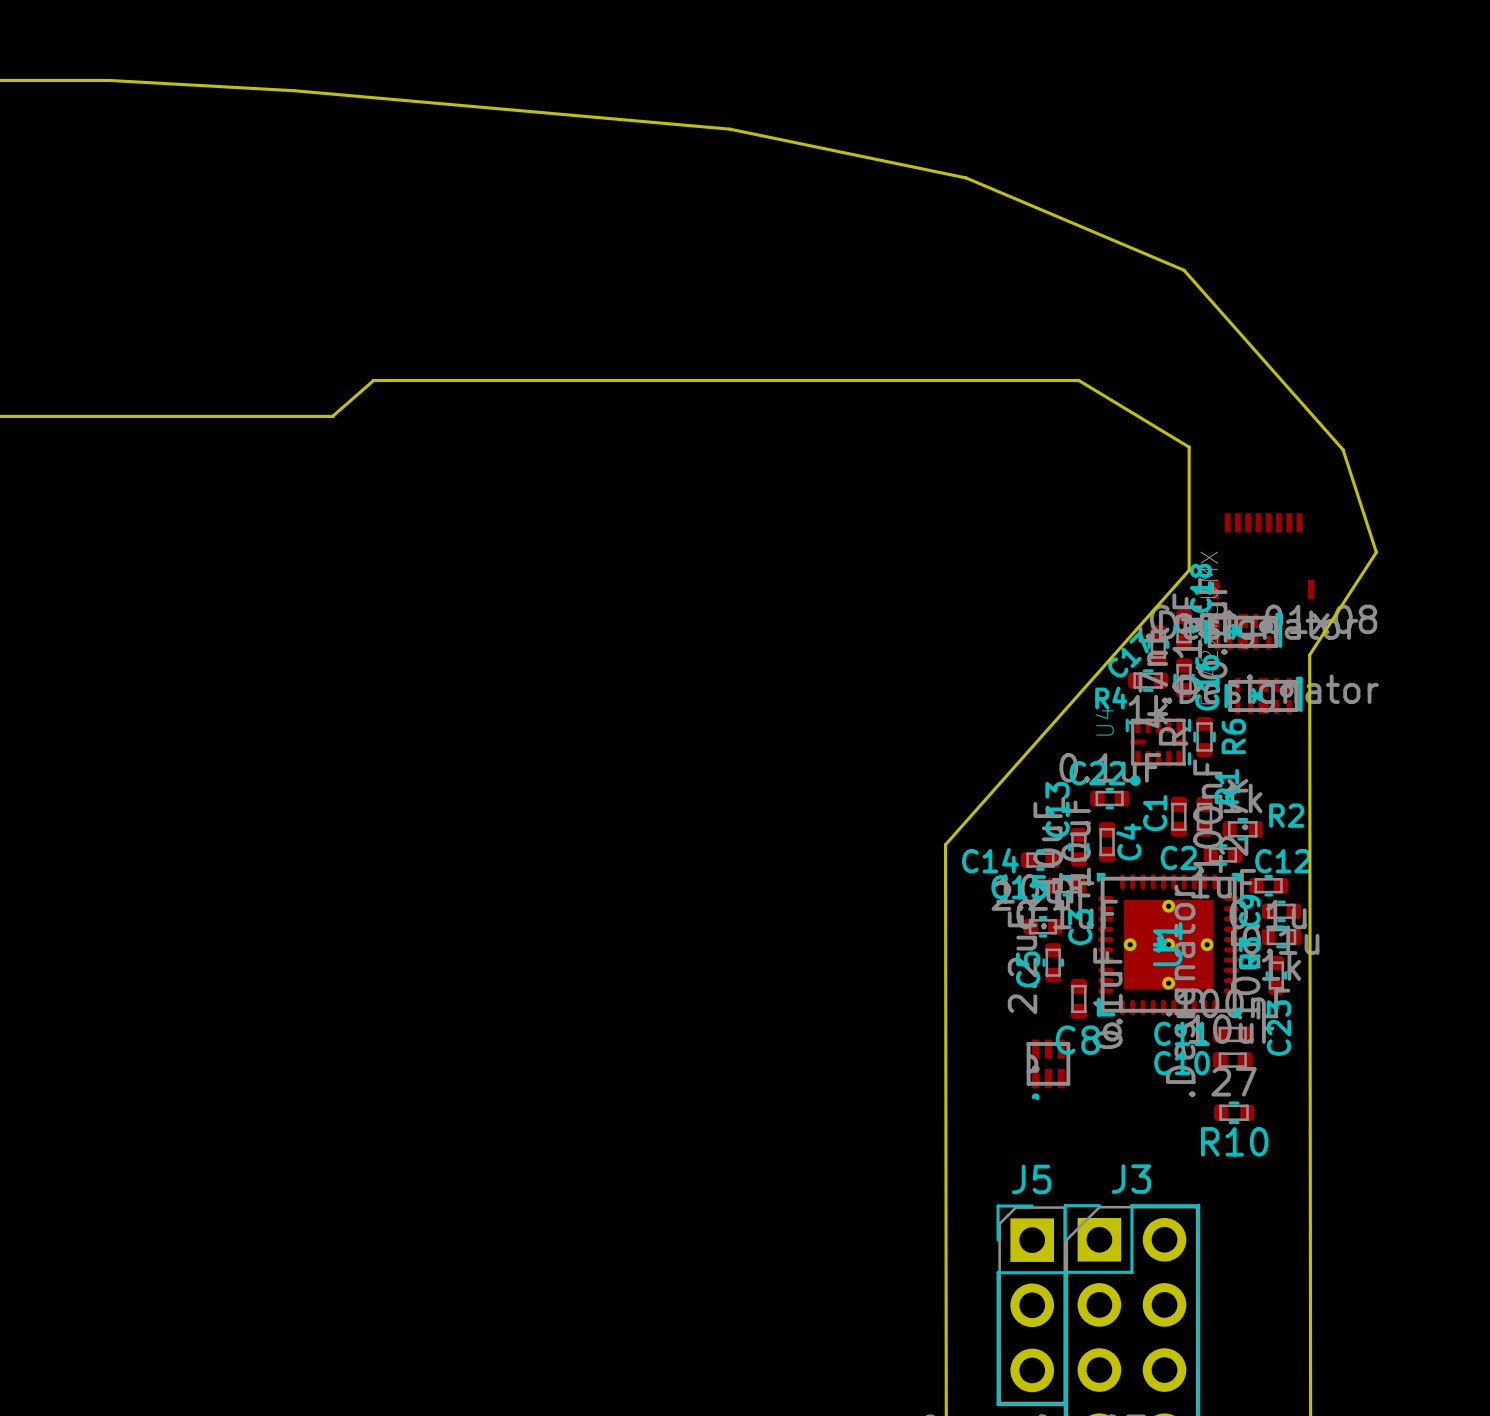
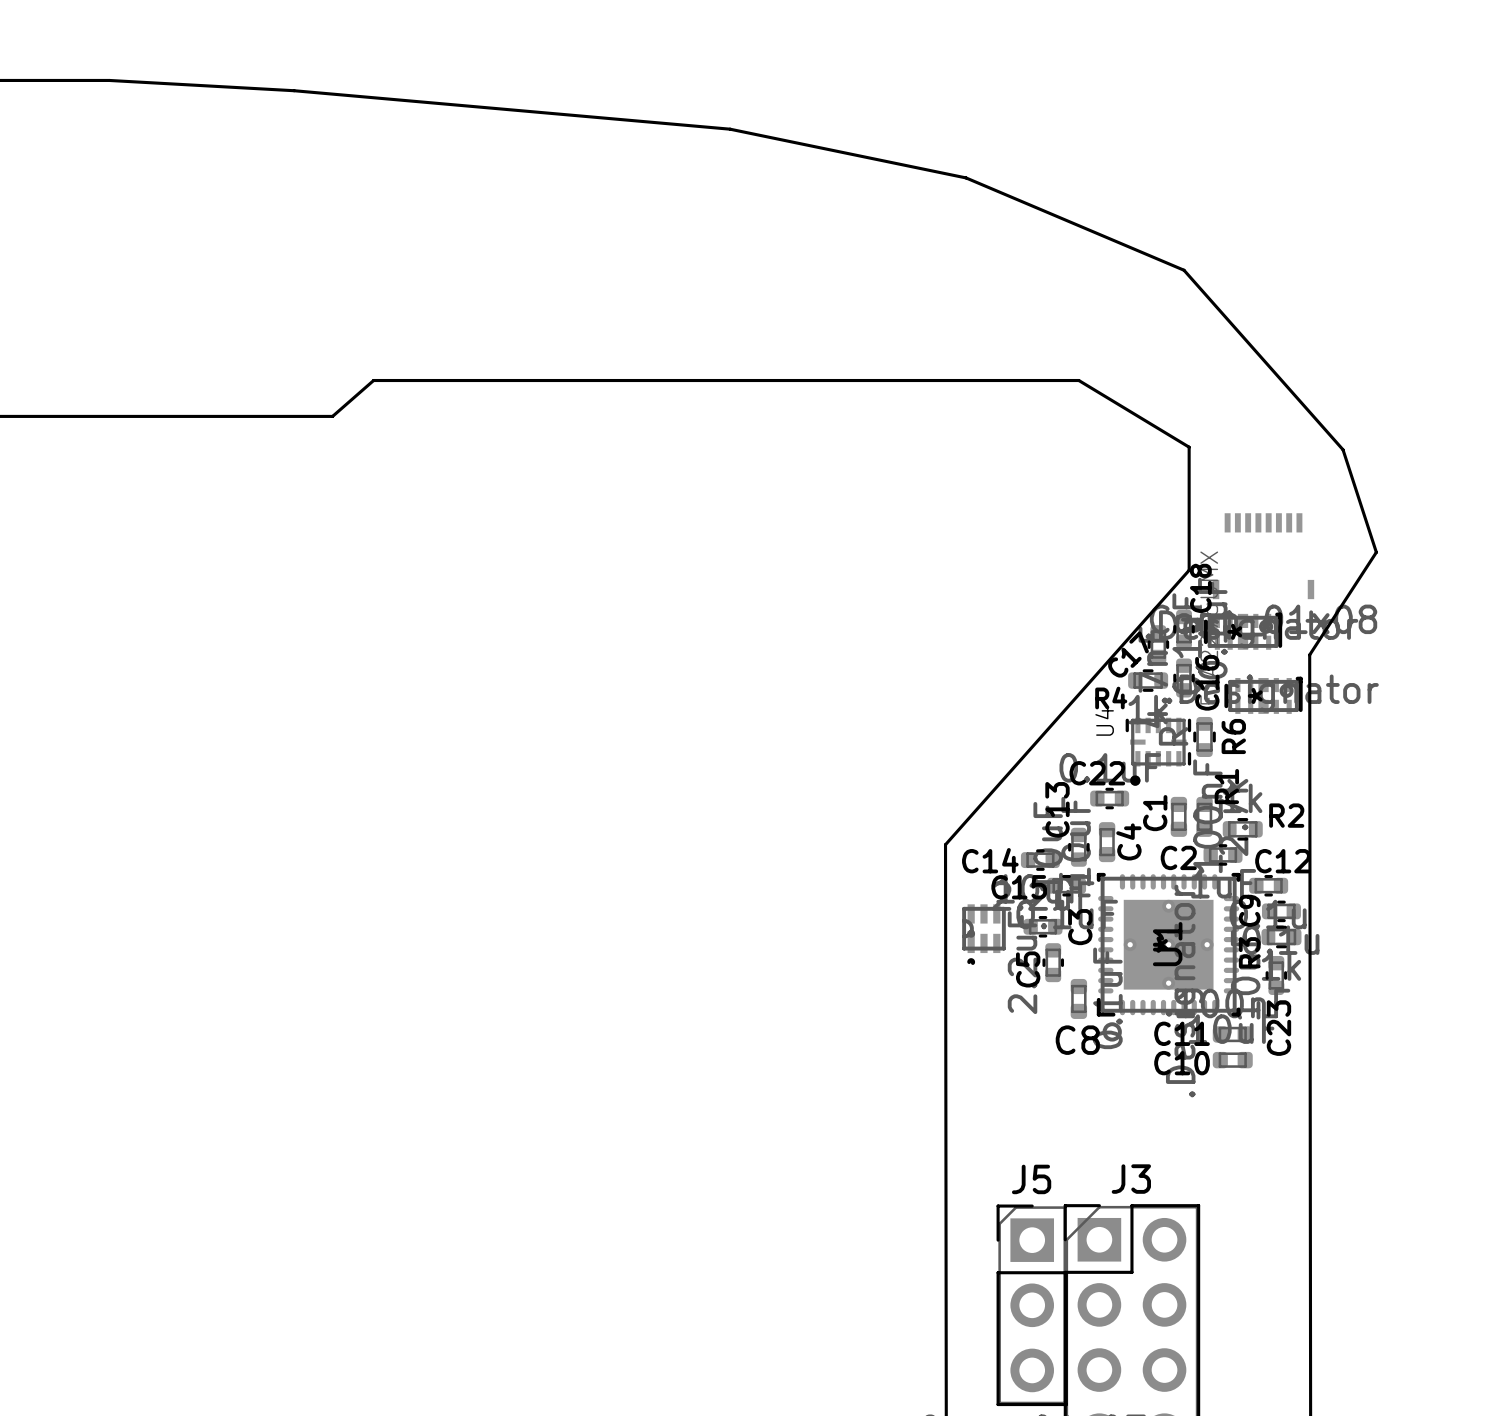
part position: (1048, 1069) -> (983, 934)
R10: 27 (1234, 1112) -> none

